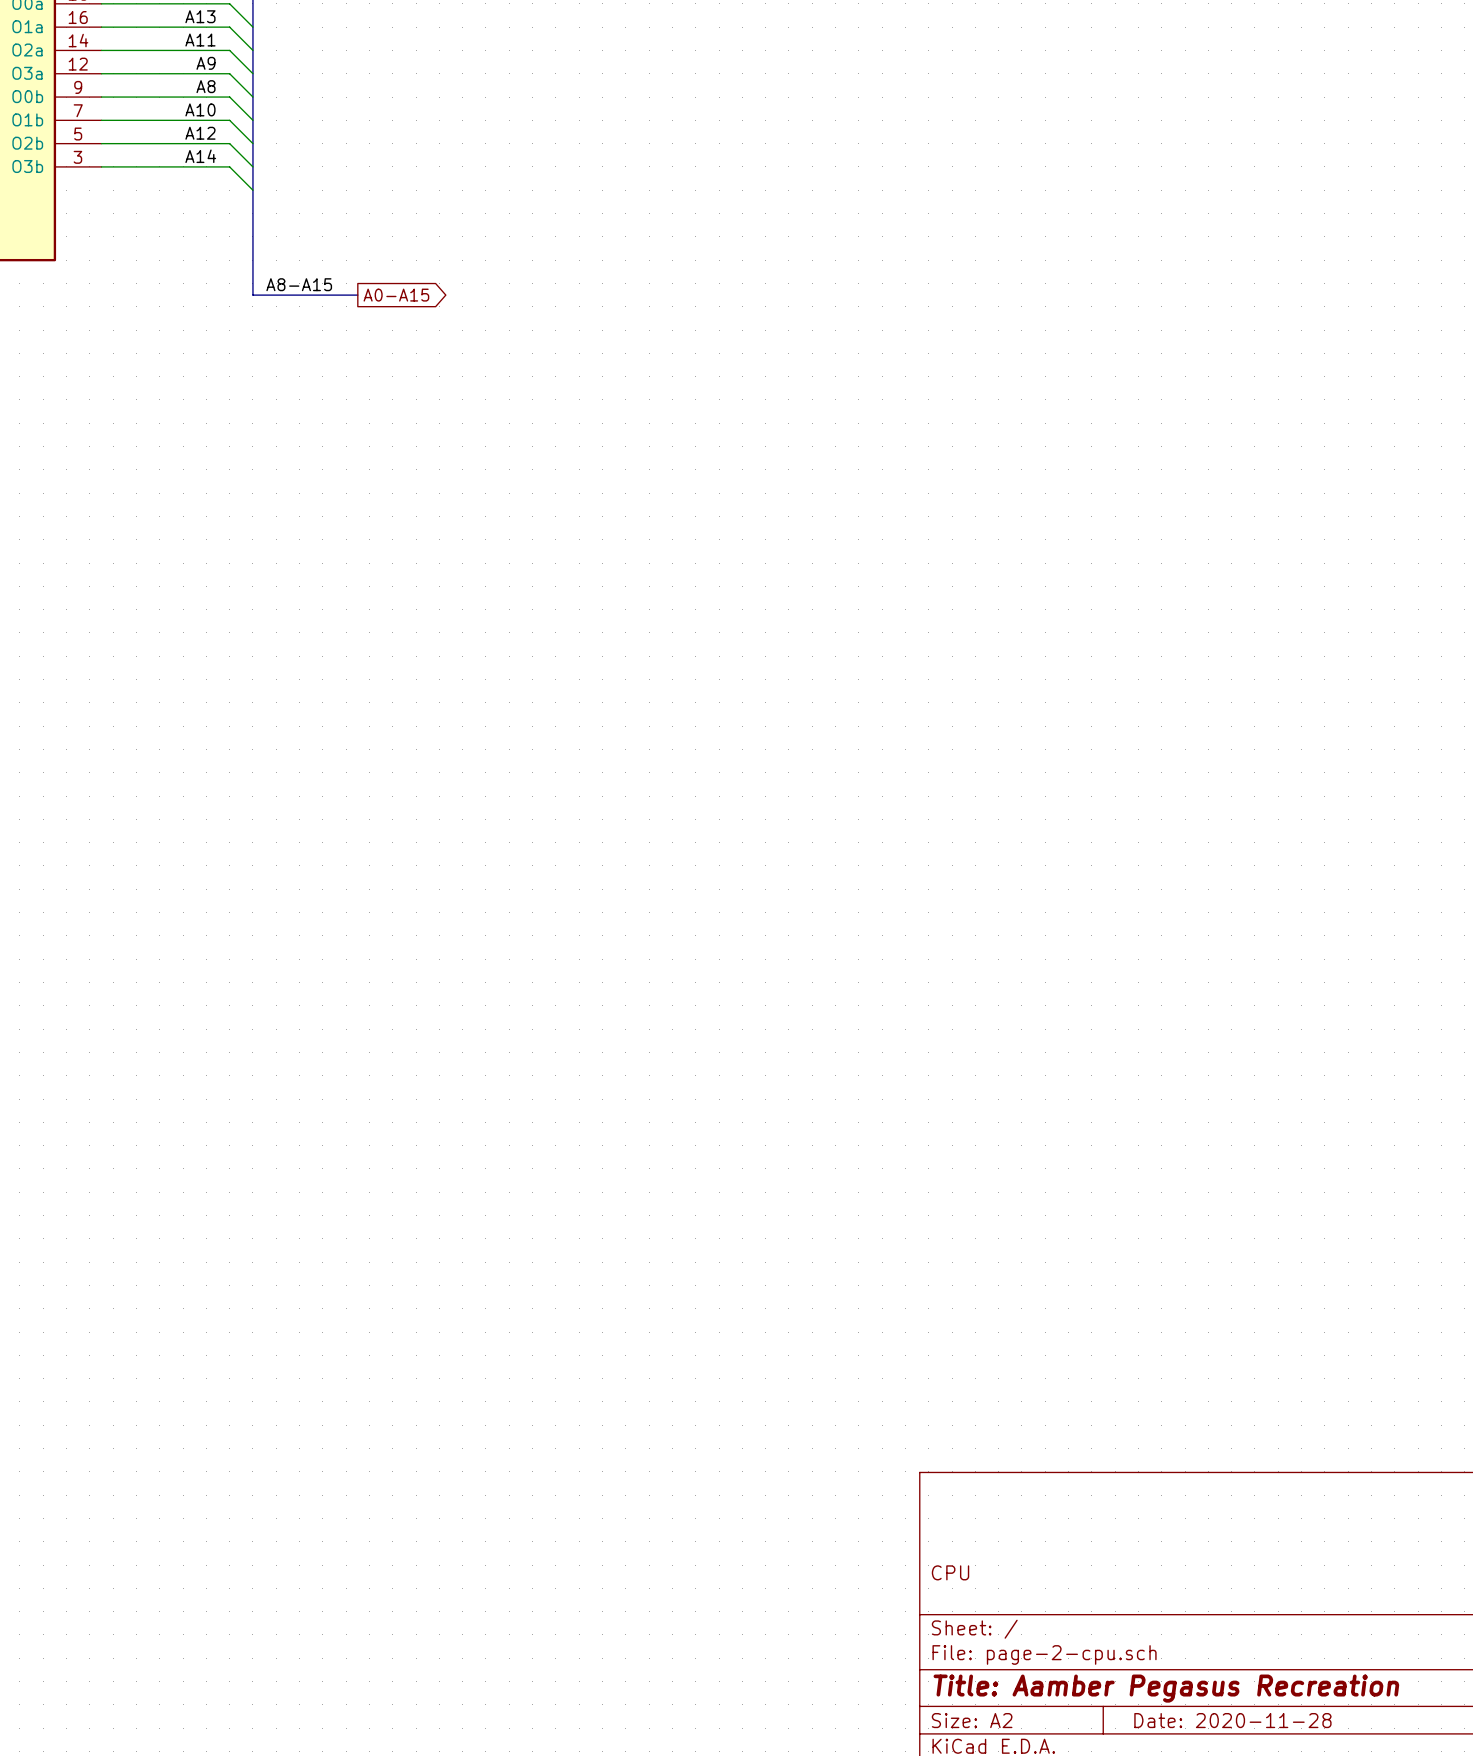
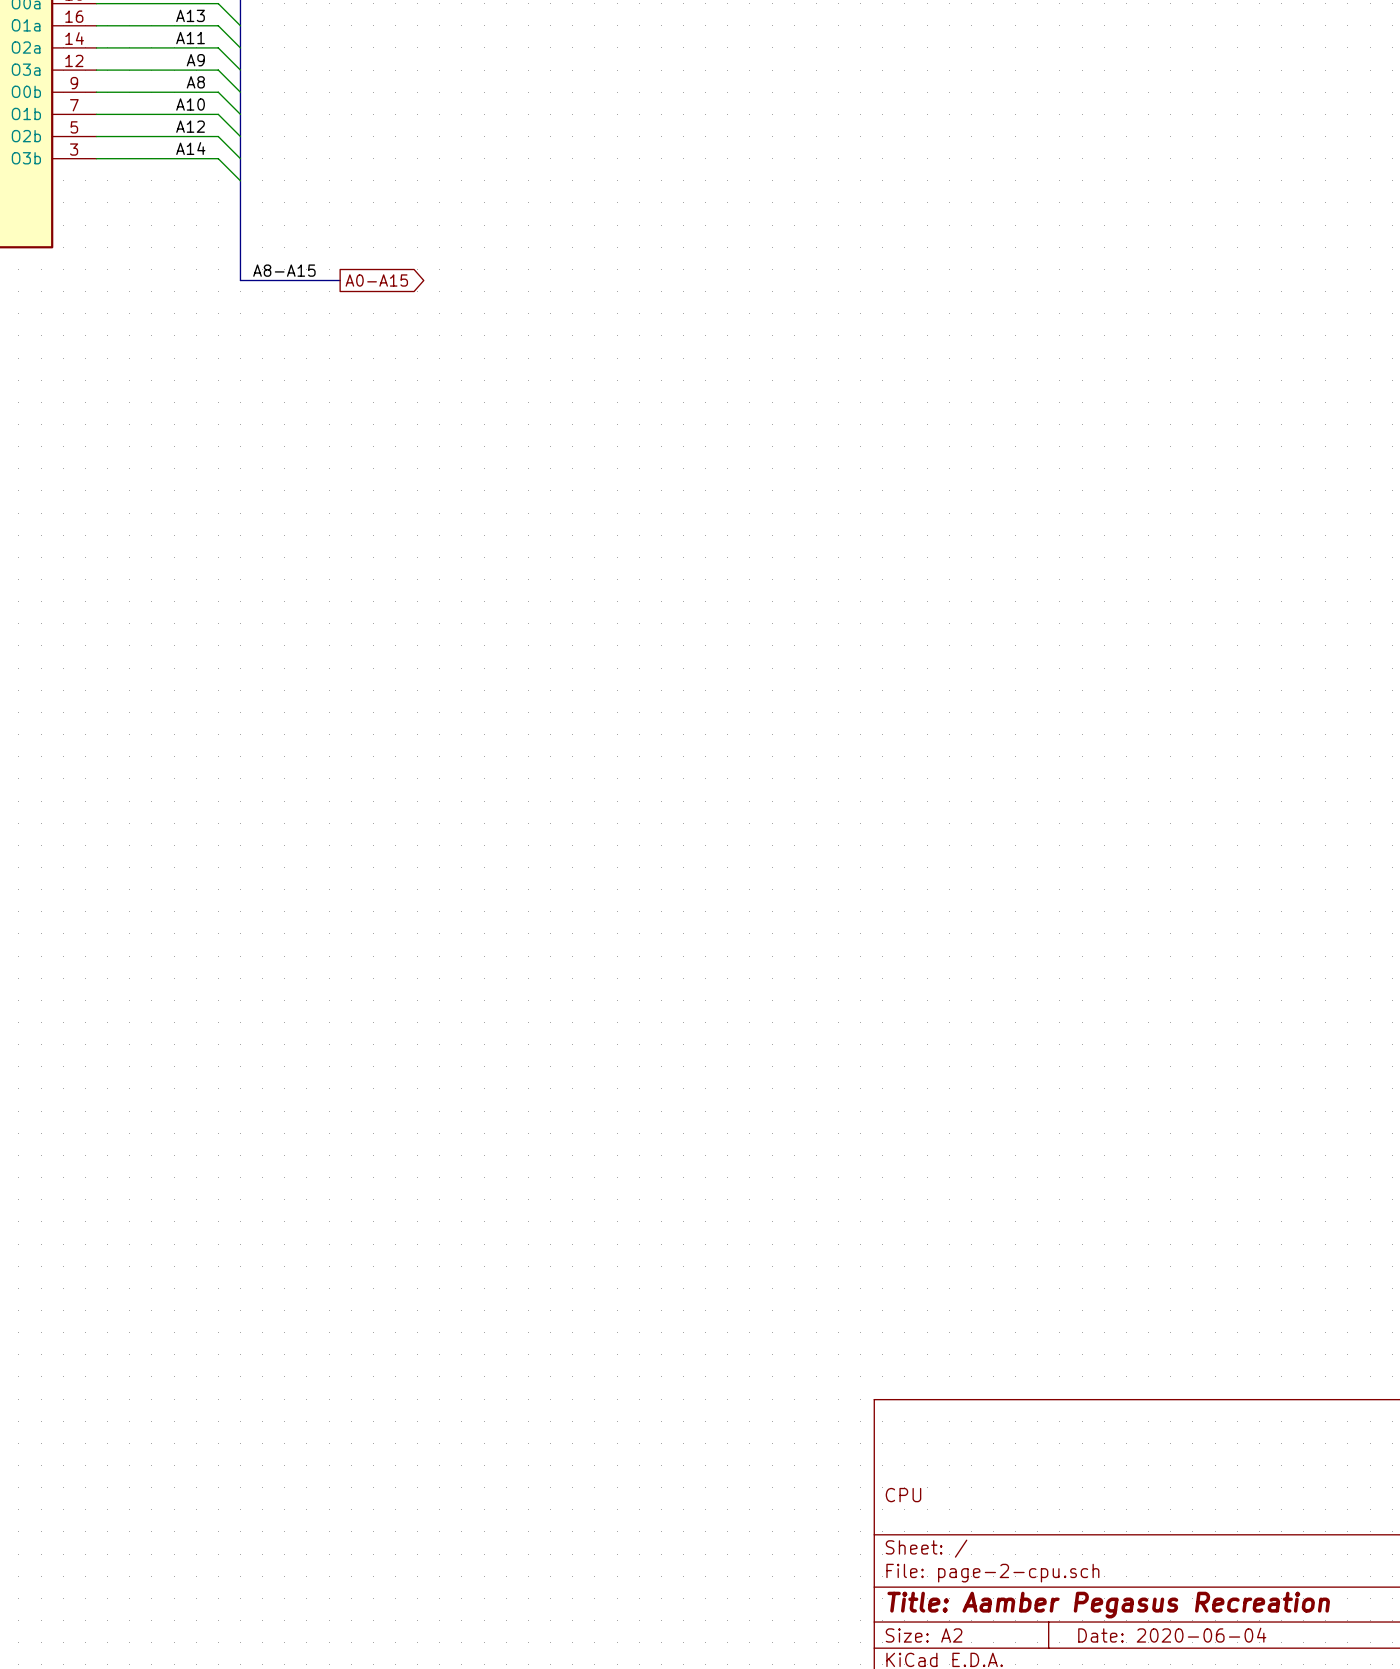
title block: Date: 2020-11-28 (1232, 1720) -> Date: 2020-06-04 (1172, 1635)

